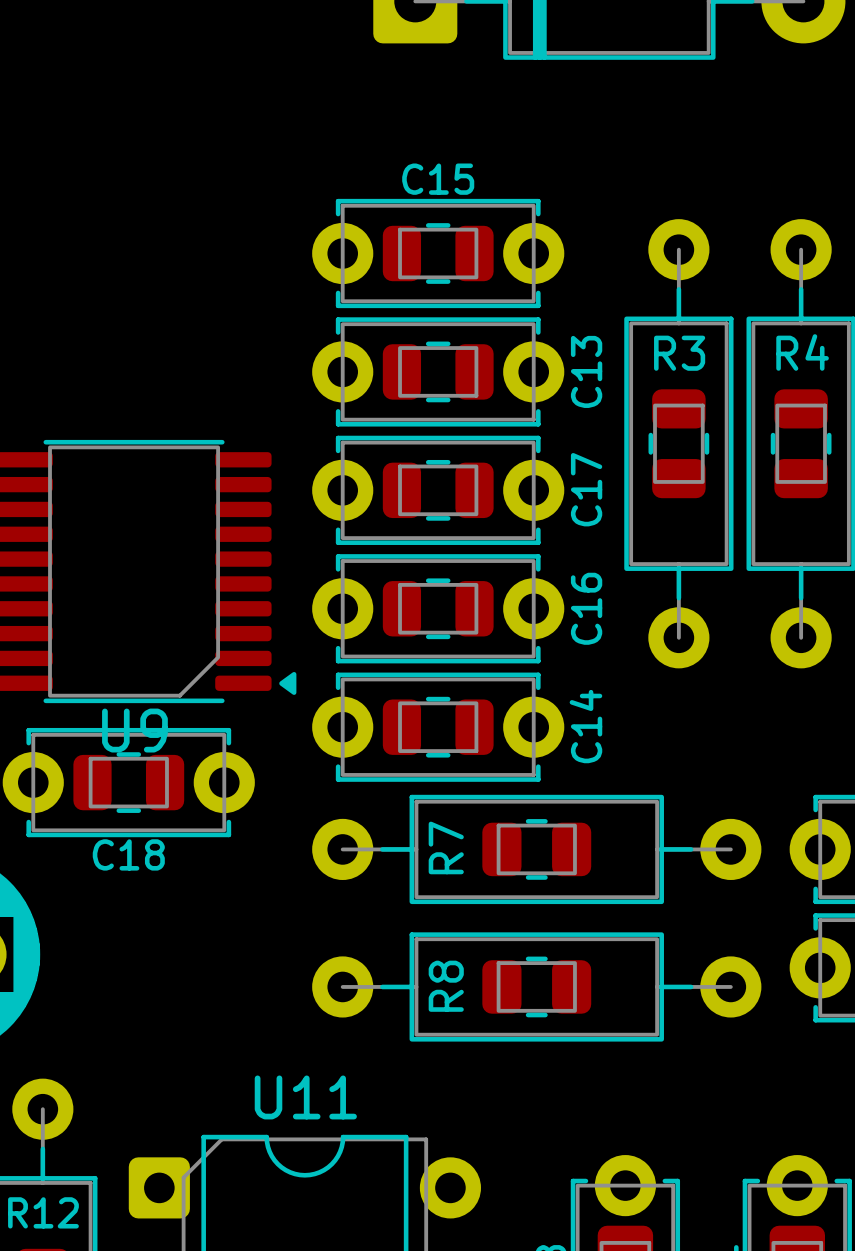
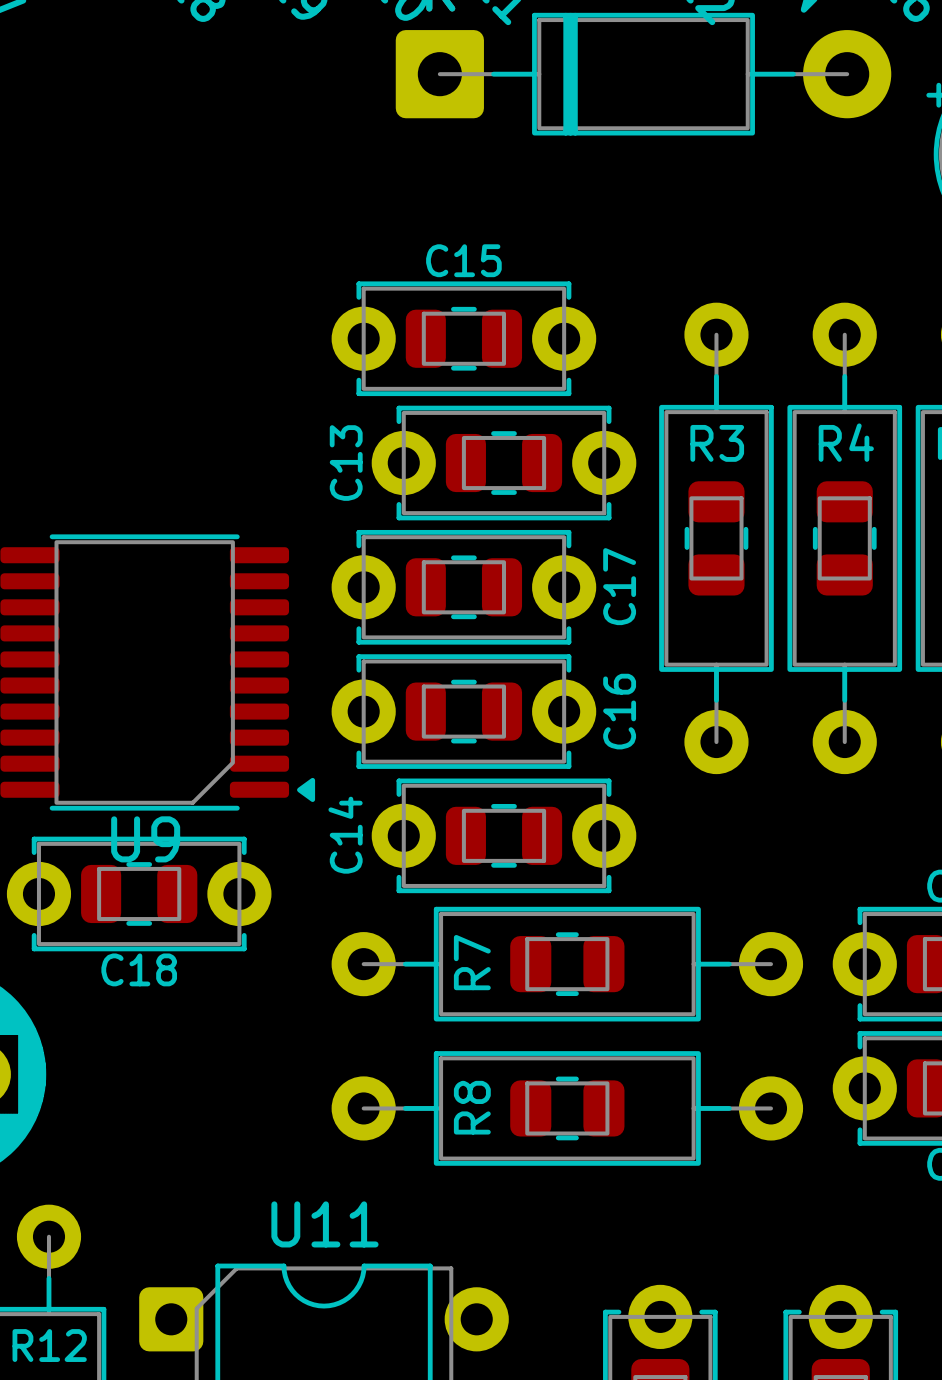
C13 position: (438, 371) -> (504, 463)
C13 name position: C13 (586, 371) -> C13 (346, 463)
C14 name position: C14 (585, 726) -> C14 (345, 835)
C14 position: (438, 727) -> (504, 835)

